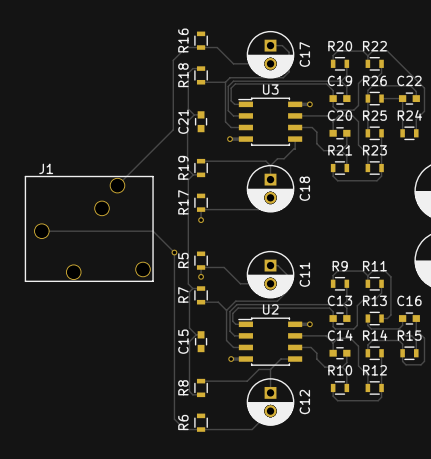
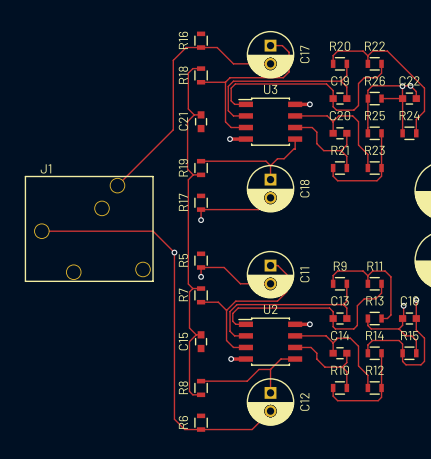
via: none -> (410, 85)
track: none -> (402, 86) (402, 98)
via: none -> (402, 86)
track: none -> (416, 300) (416, 318)
via: none -> (416, 300)
track: none -> (403, 305) (402, 318)
via: none -> (403, 305)

